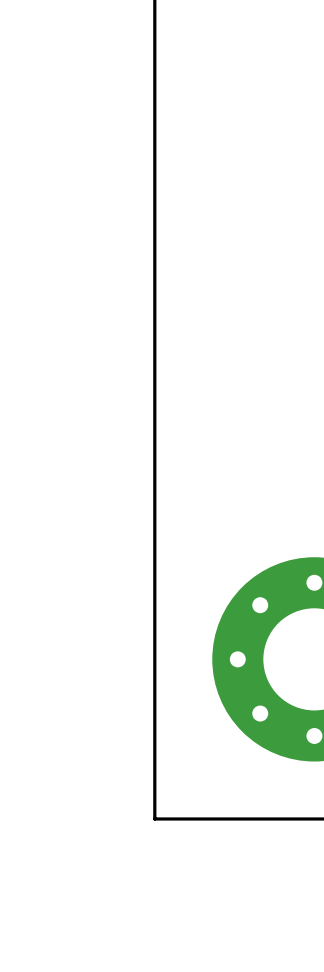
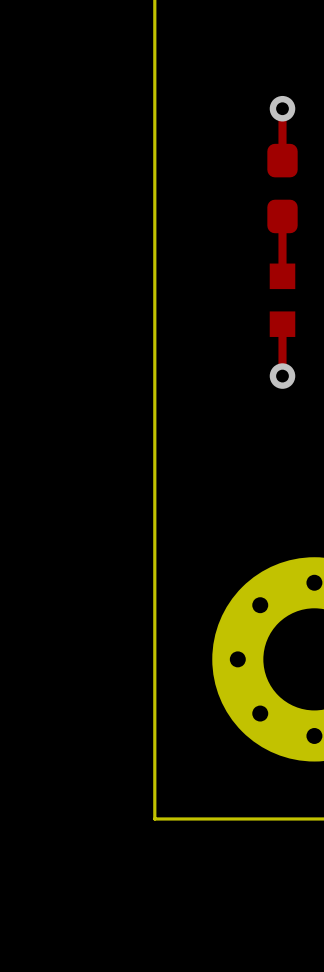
top track: none -> (282, 108) (282, 160)
via: none -> (282, 108)
part: none -> (282, 188)
top track: none -> (282, 216) (282, 276)
part: none -> (282, 300)
top track: none -> (282, 324) (282, 376)
via: none -> (282, 376)

